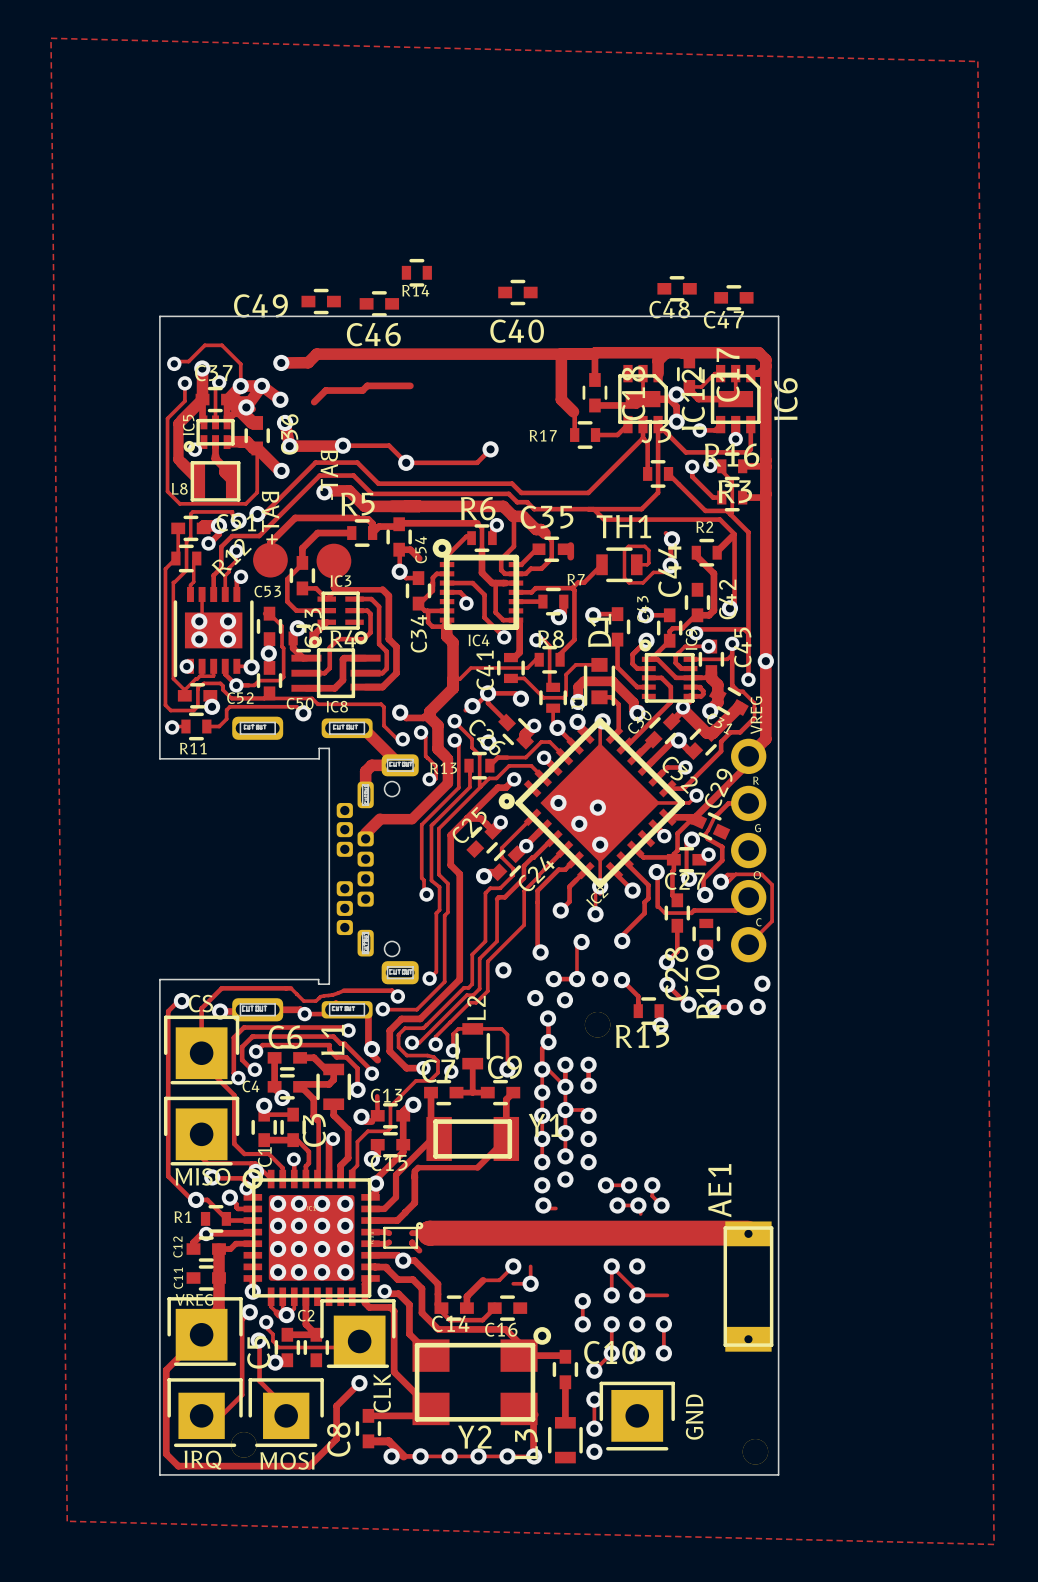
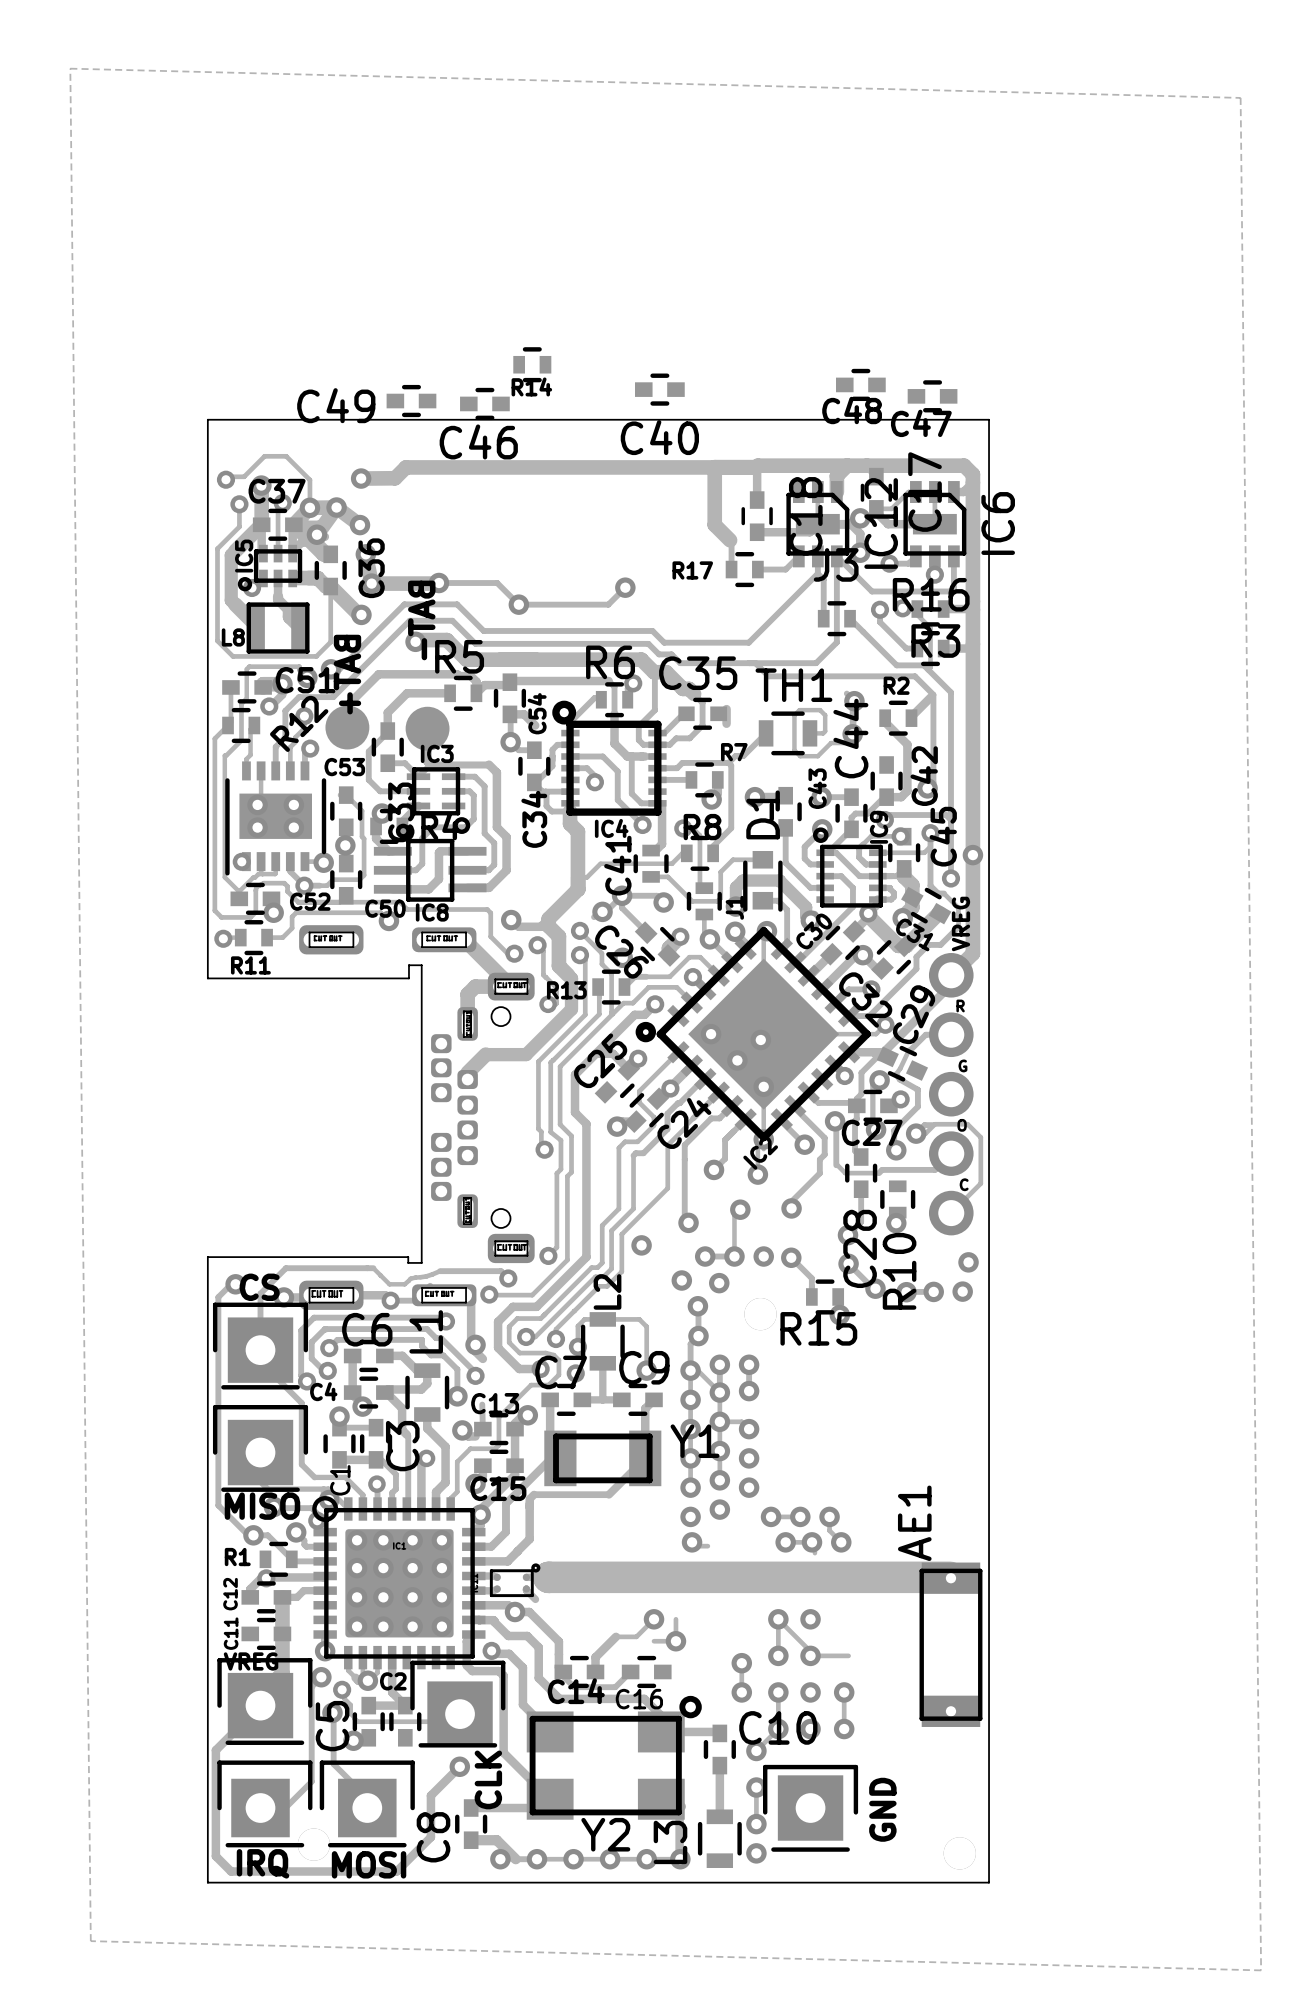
track: (410, 385) (367, 385) (362, 390) (325, 390) (314, 402) -> none

